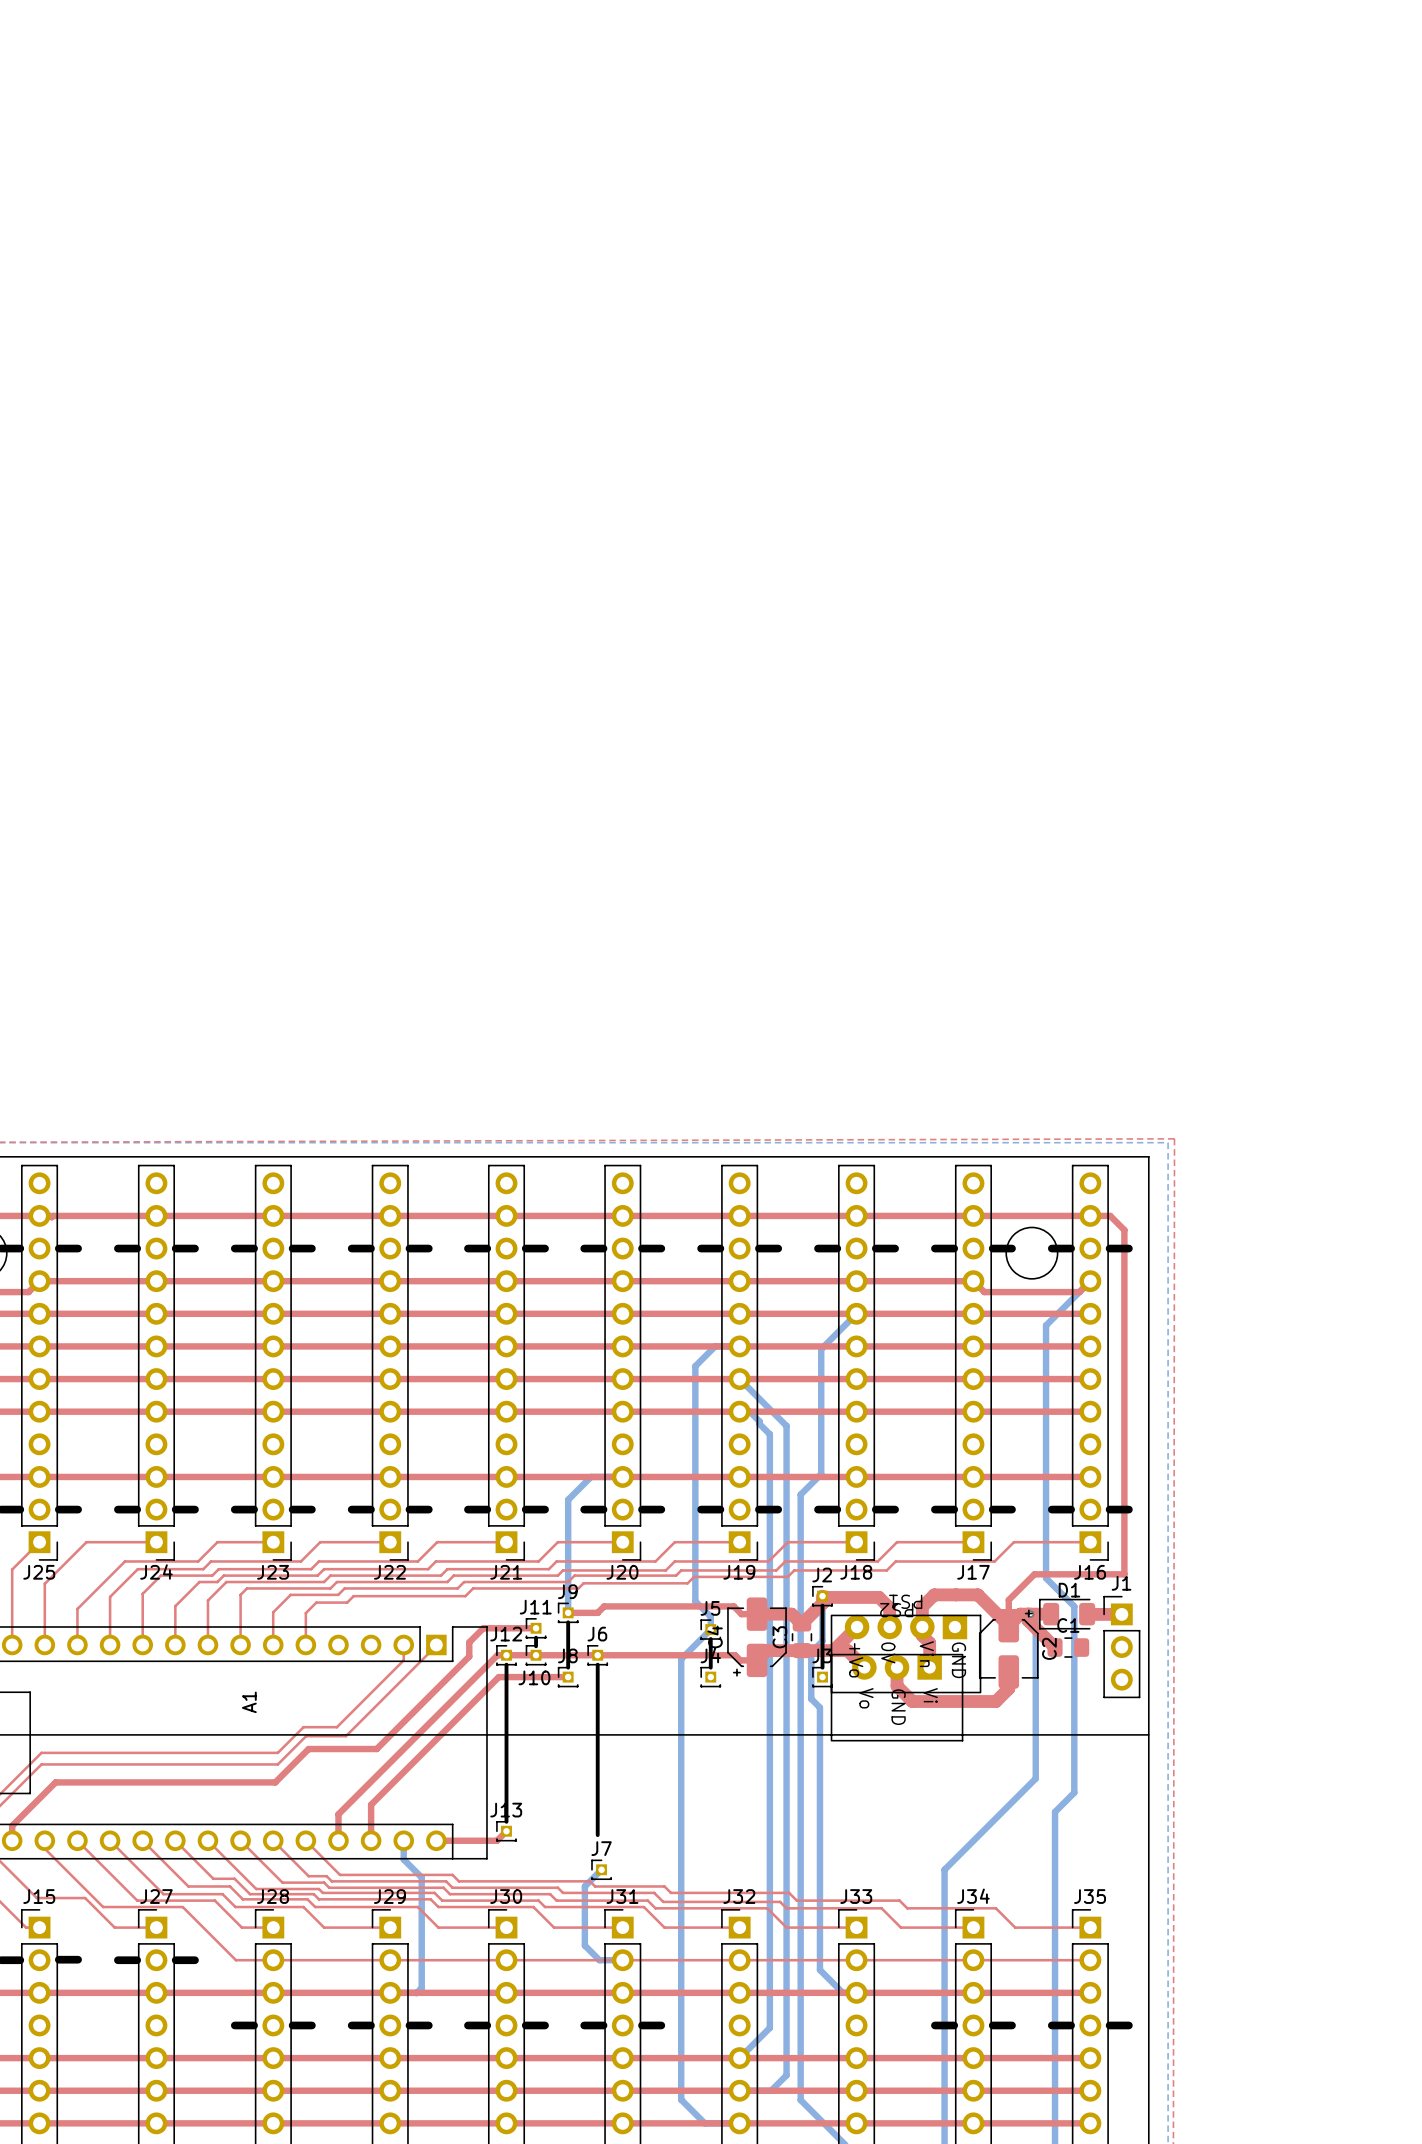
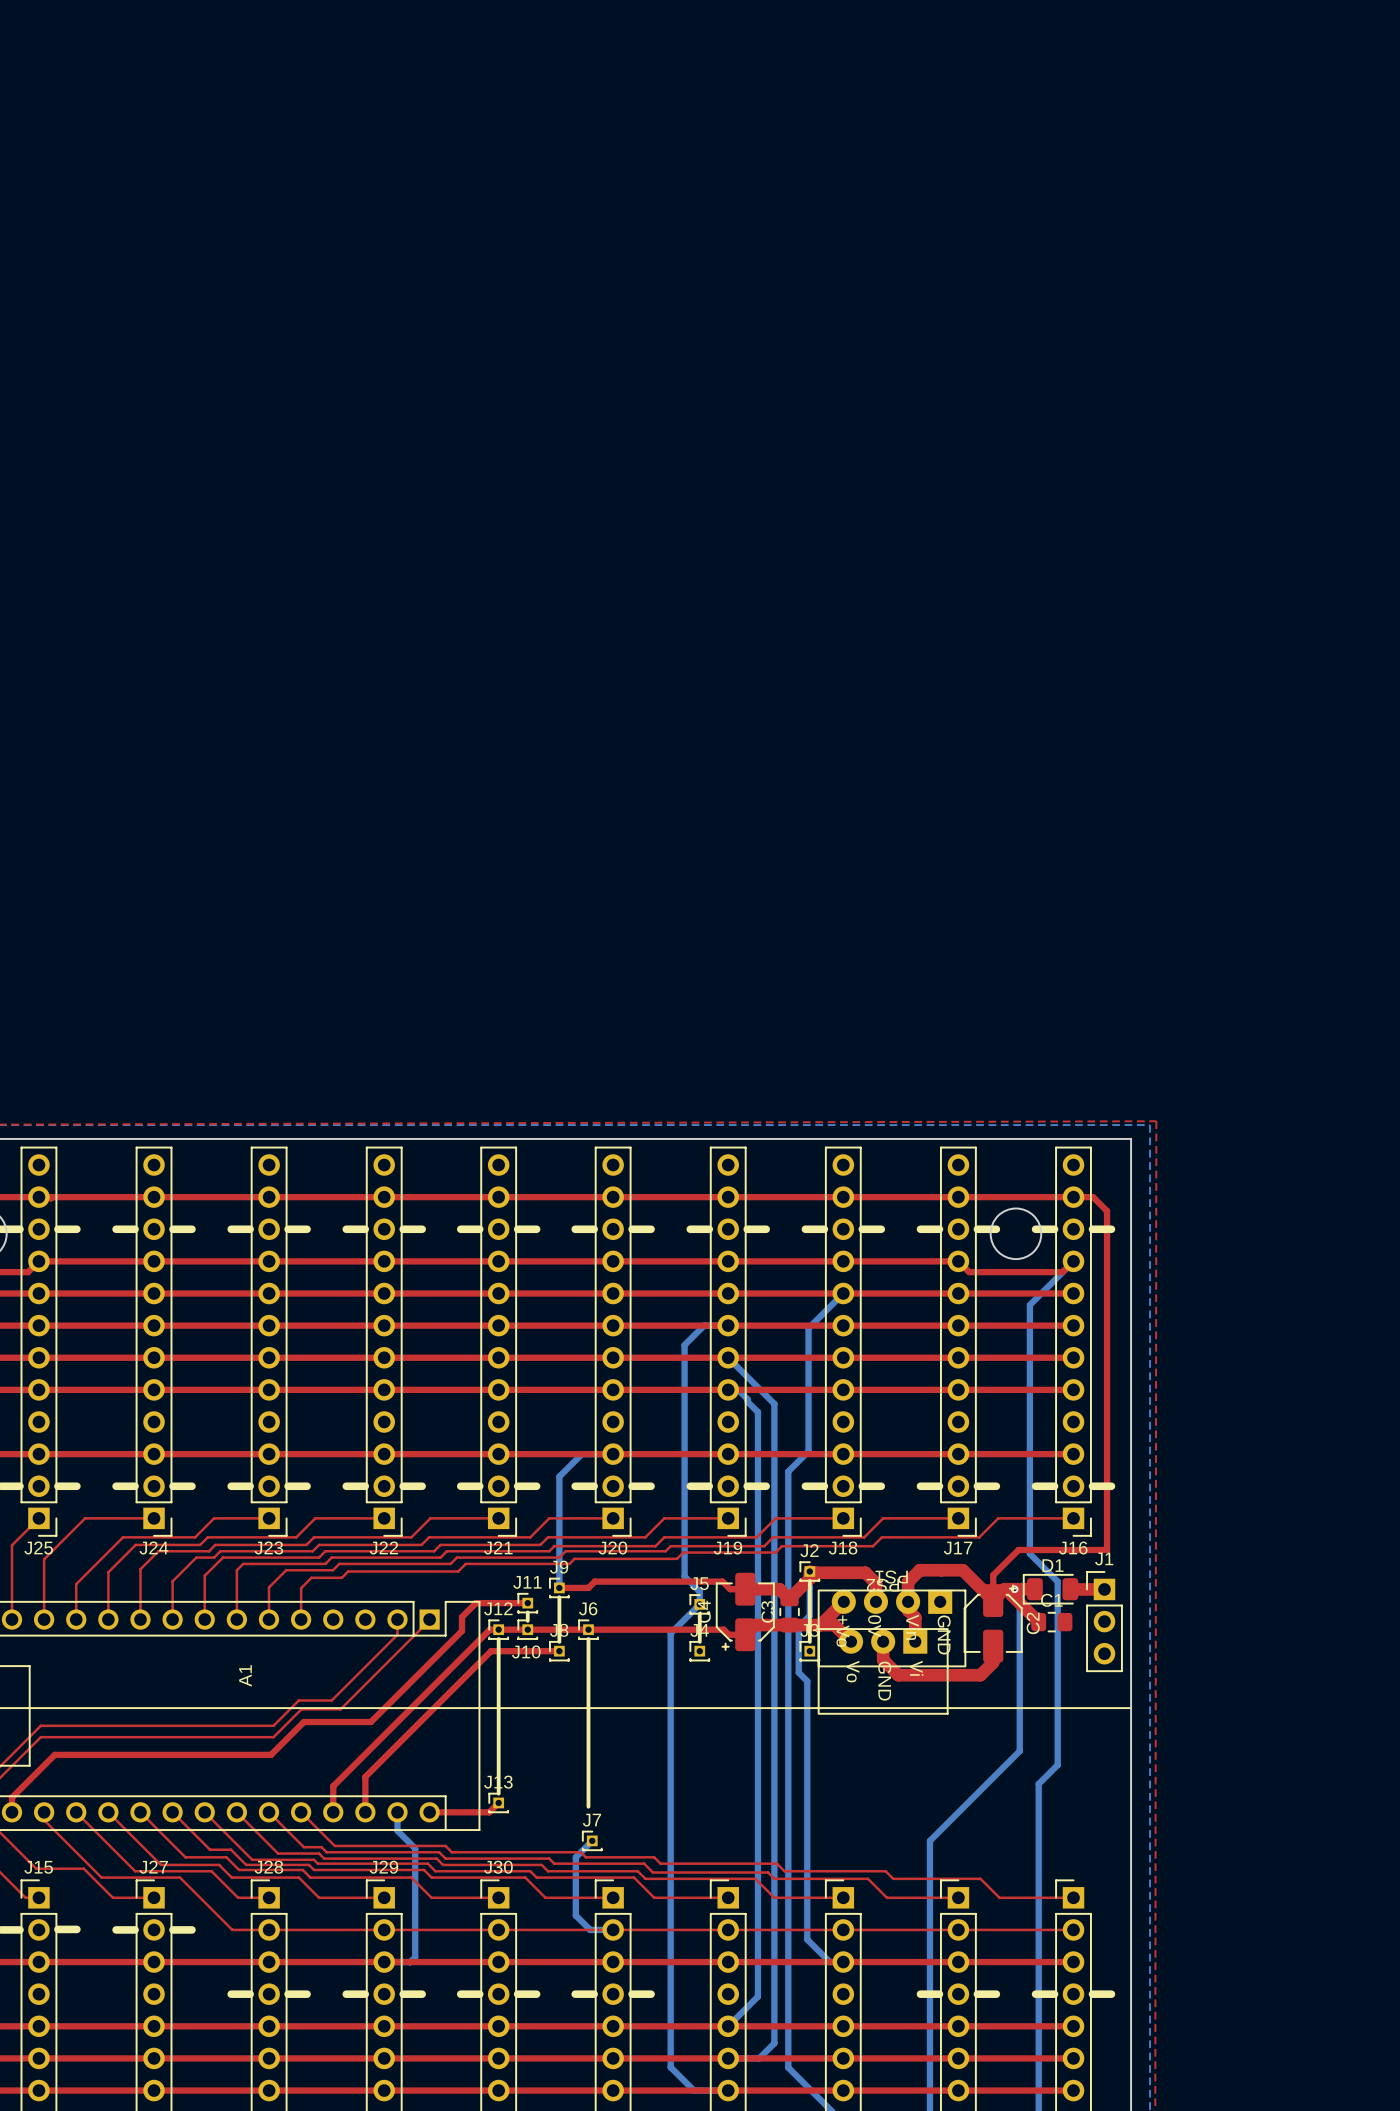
J31 name: J31 (622, 1896) -> none
J32 name: J32 (739, 1896) -> none
J33 name: J33 (856, 1896) -> none
J34 name: J34 (973, 1896) -> none
J35 name: J35 (1090, 1896) -> none

